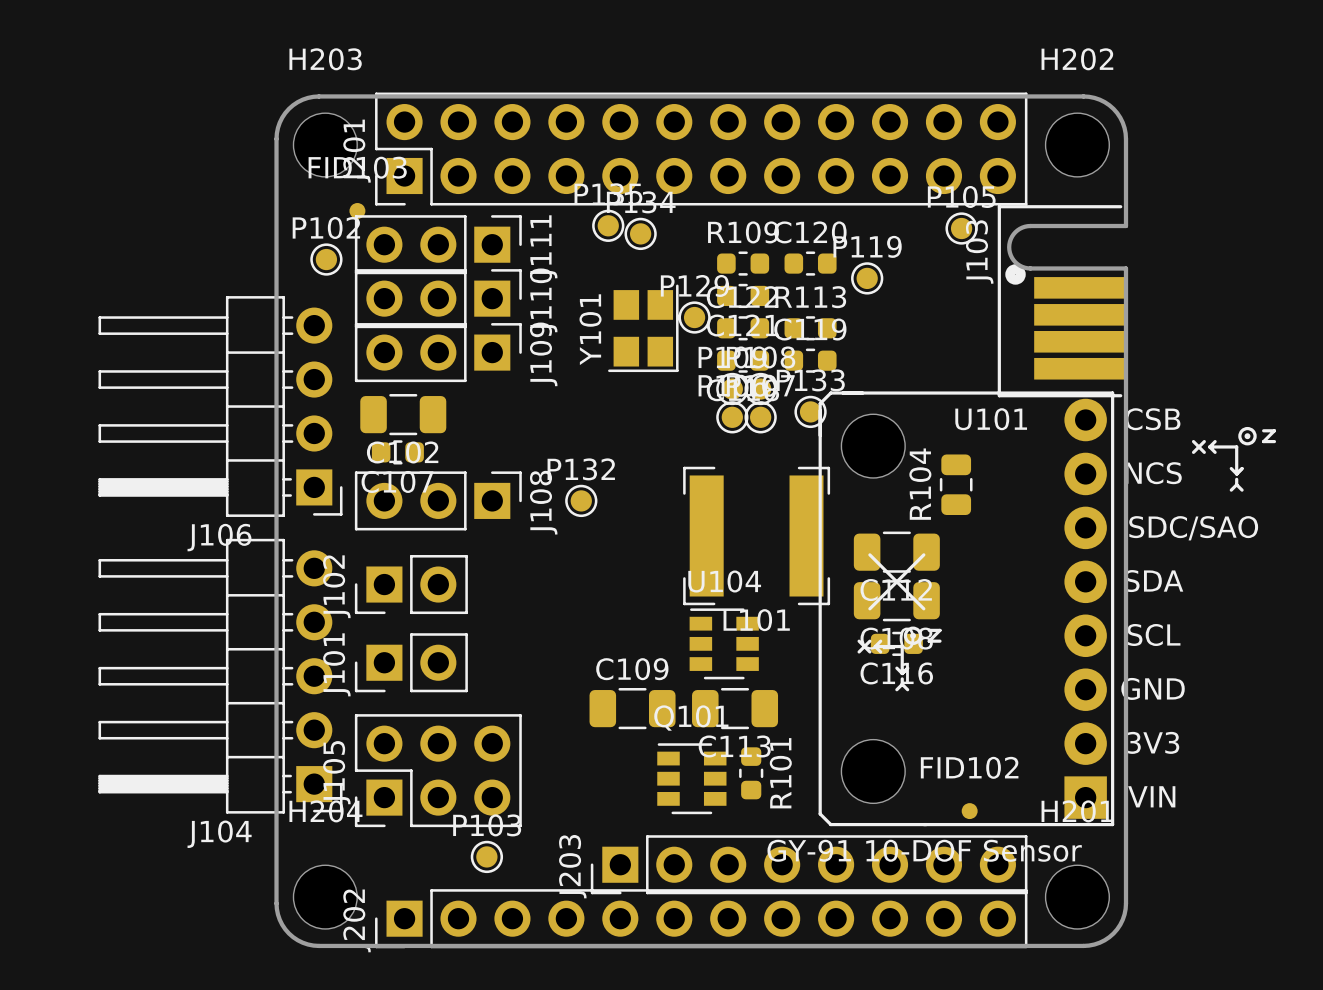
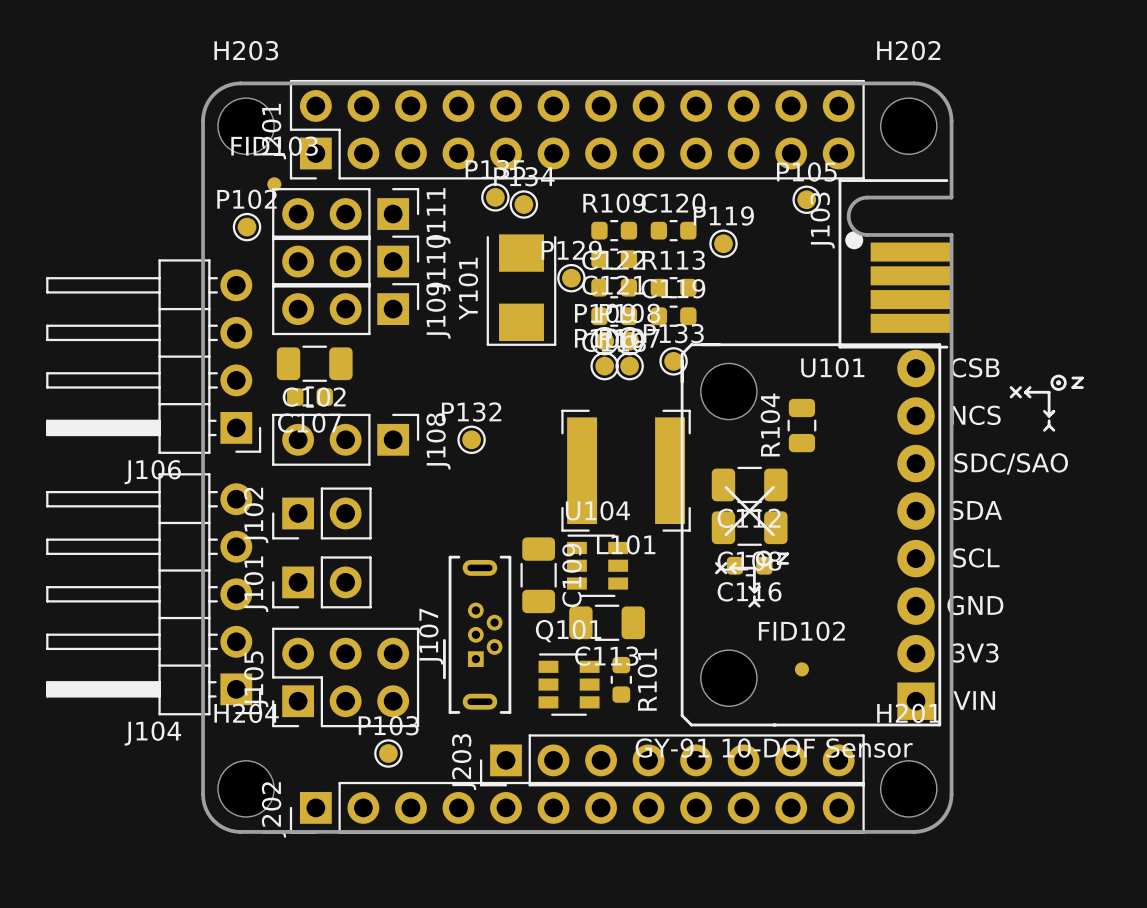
Y101 footprint: [608, 284, 679, 373] -> [486, 234, 557, 346]
C109 rotation: 0° (632, 708) -> 90° clockwise (538, 575)
C109 position: (632, 708) -> (538, 575)
J107: none -> (477, 634)
FID102 position: (969, 811) -> (801, 669)

